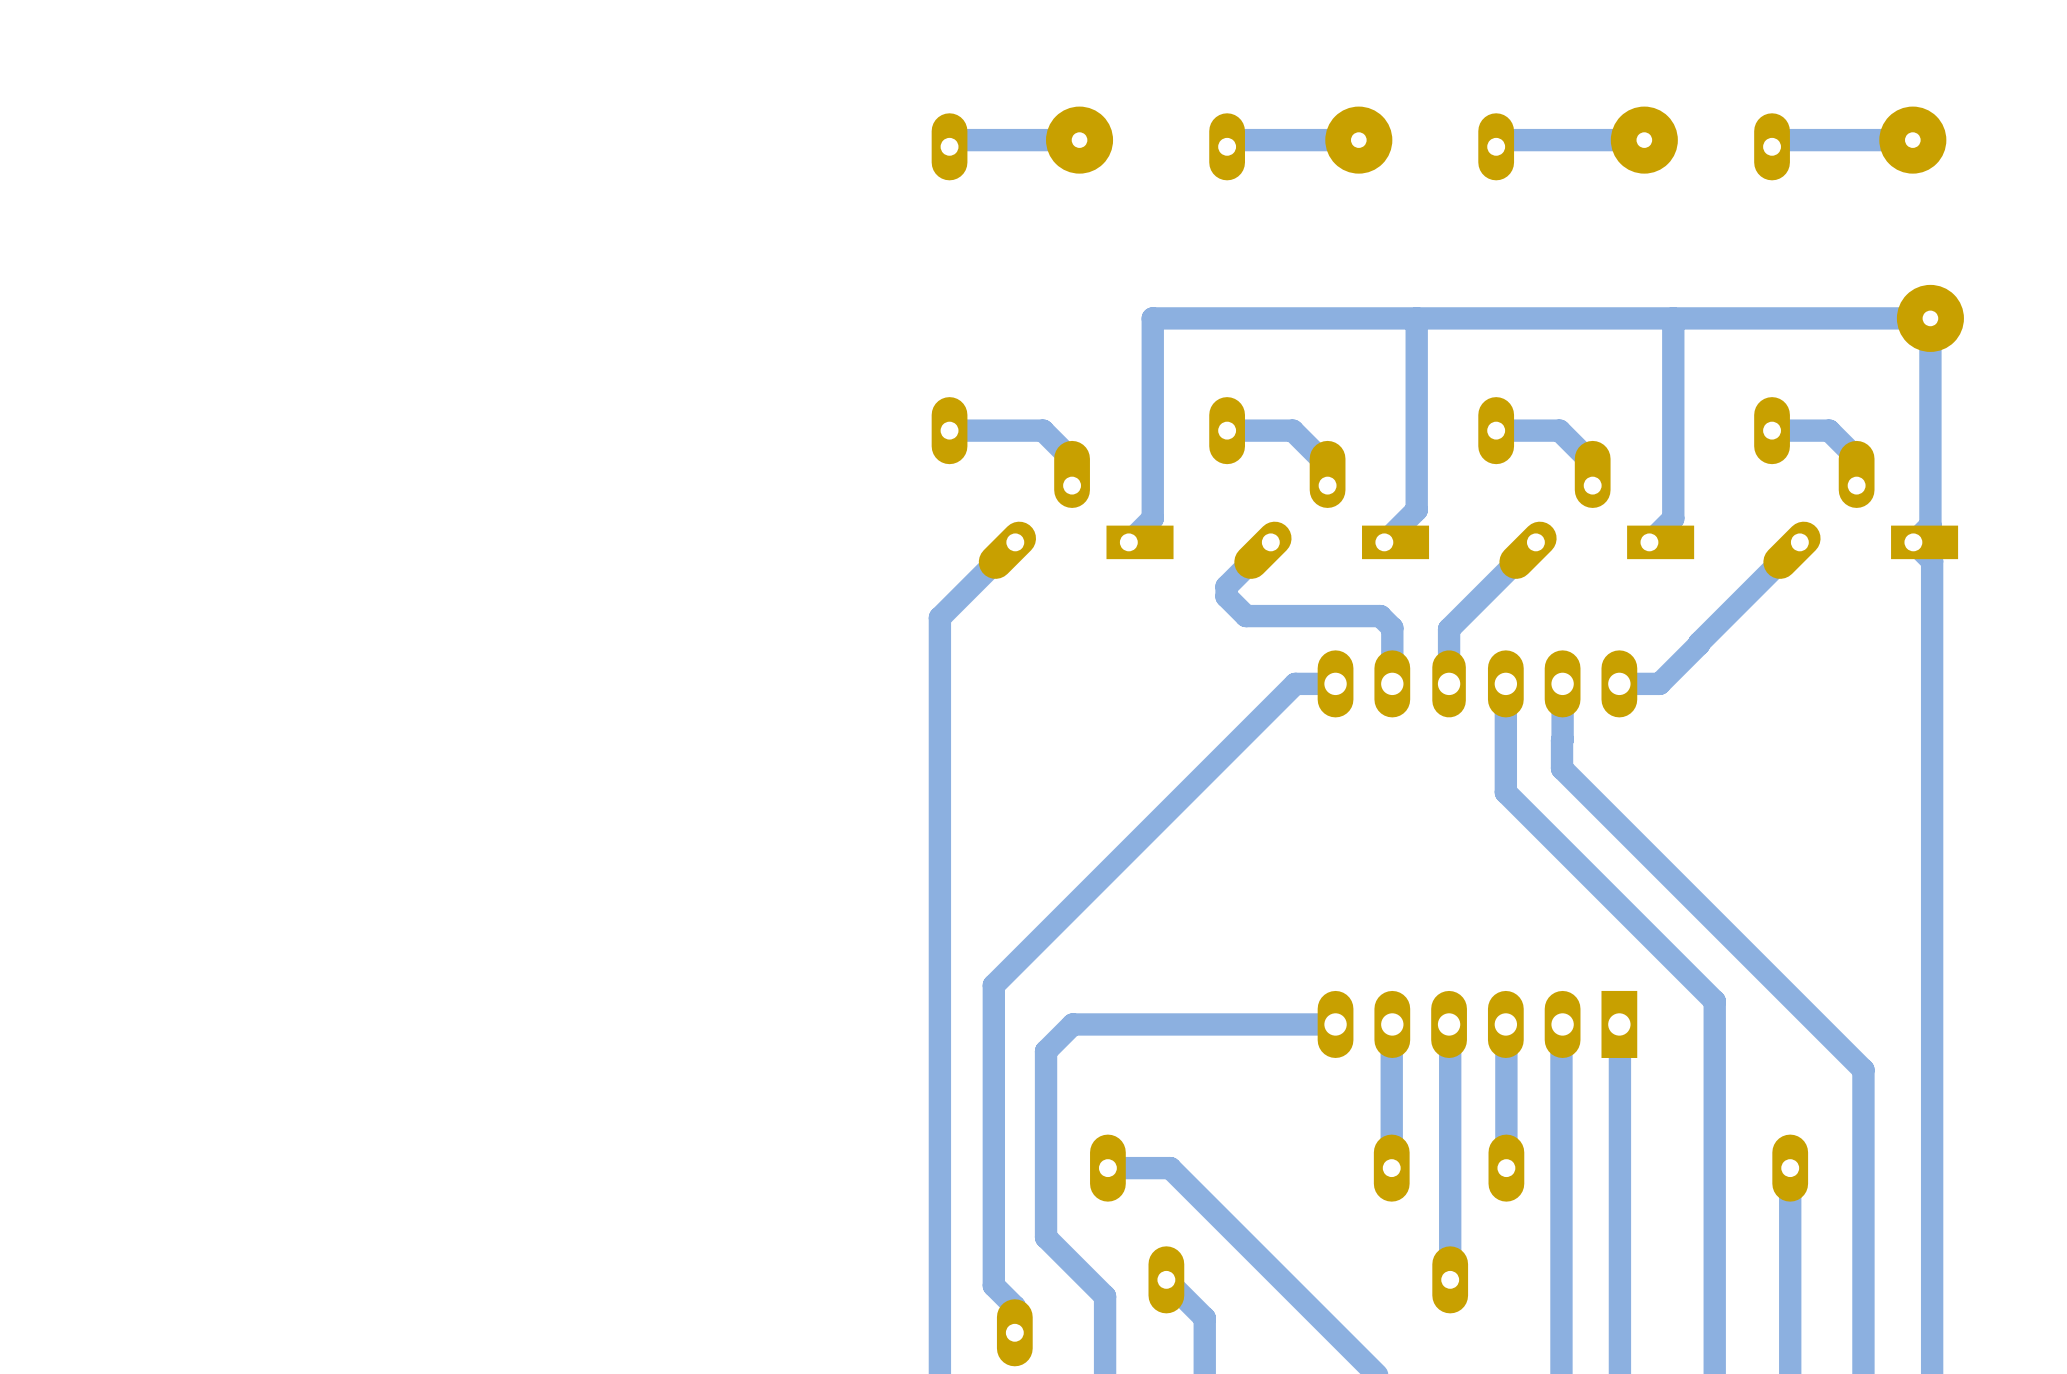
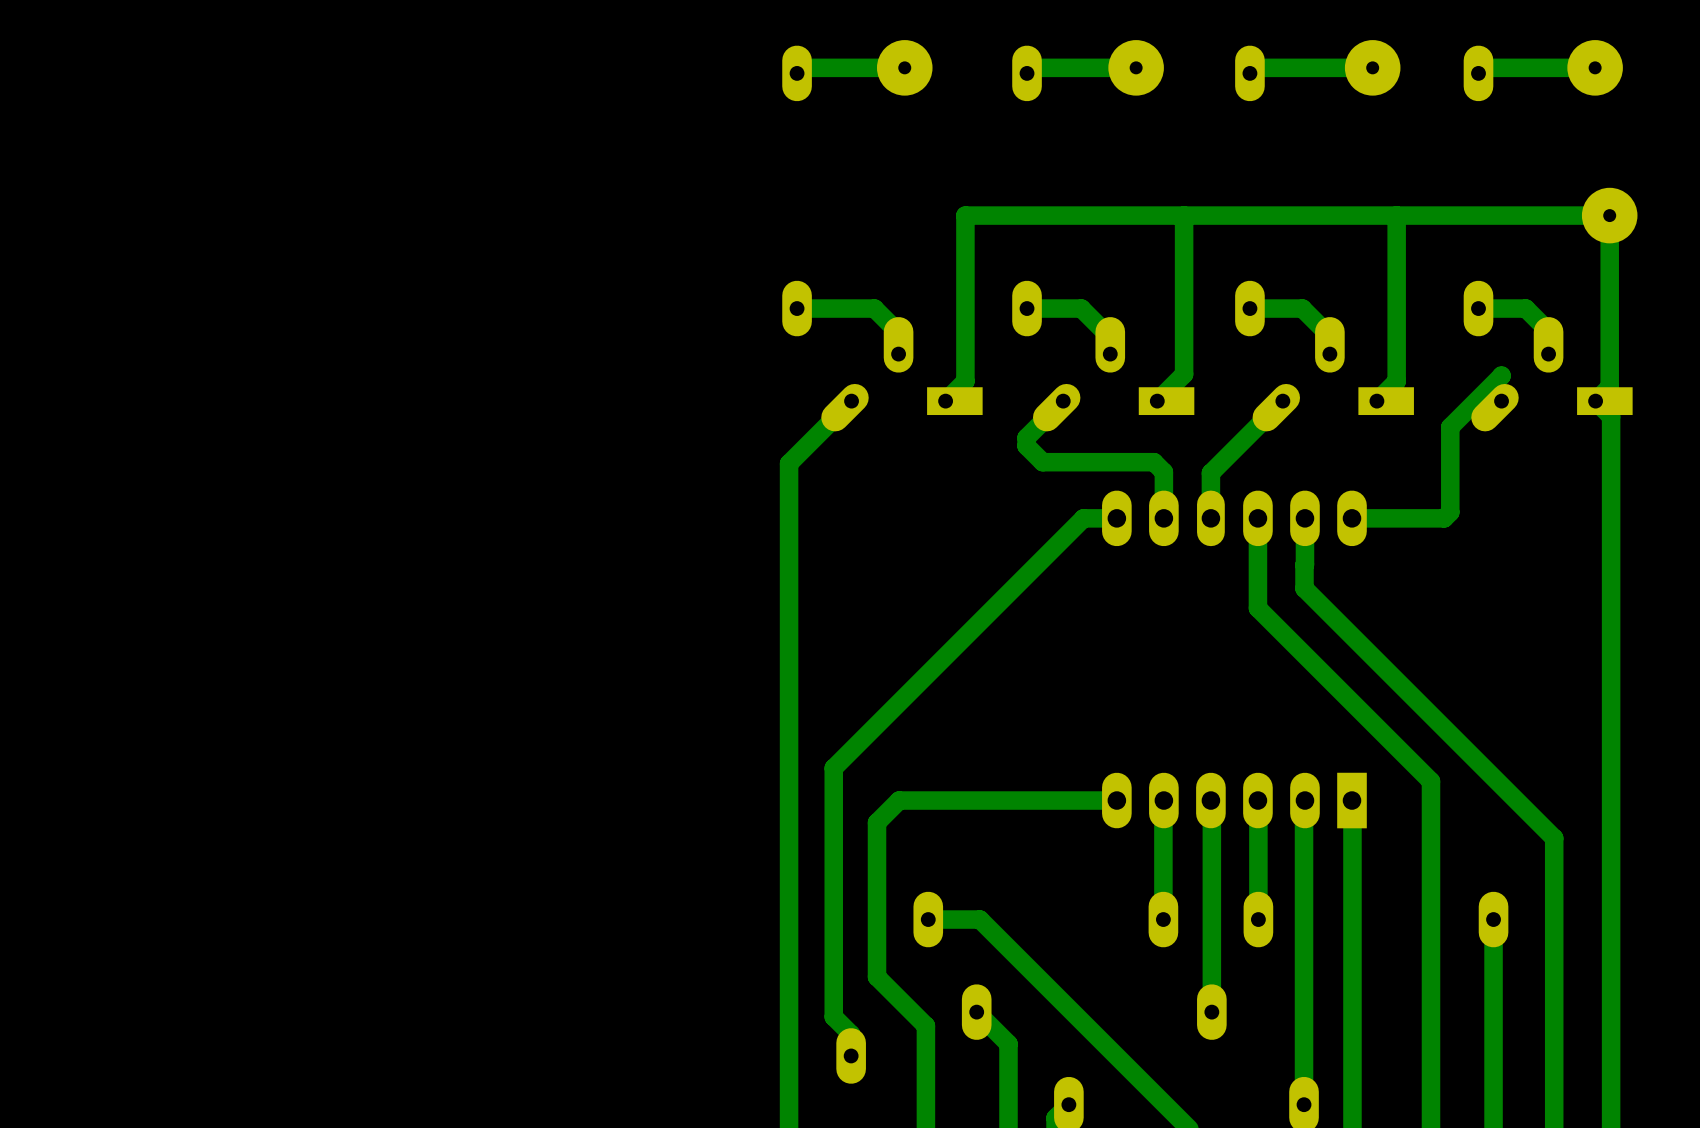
bottom track: (1799, 542) (1659, 683) -> (1501, 375) (1450, 427) (1450, 512) (1444, 518) (1385, 518)

